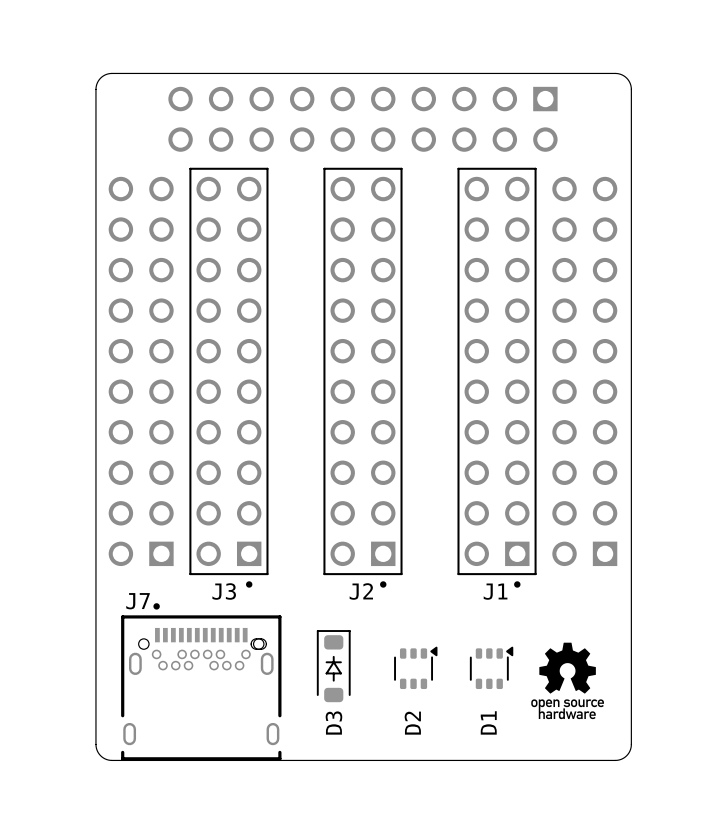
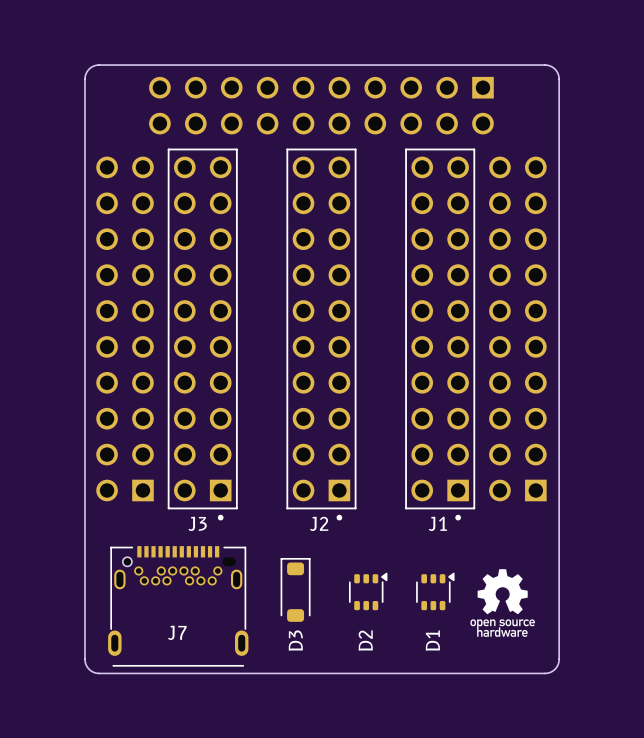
J7 name position: J7 (138, 601) -> J7 (177, 632)
J7 footprint: [121, 603, 282, 761] -> [108, 546, 249, 667]
line: (333, 656) (333, 662) -> none
line: (326, 662) (340, 662) -> none
line: (333, 662) (340, 673) (326, 673) (333, 662) -> none
line: (333, 673) (333, 680) -> none

